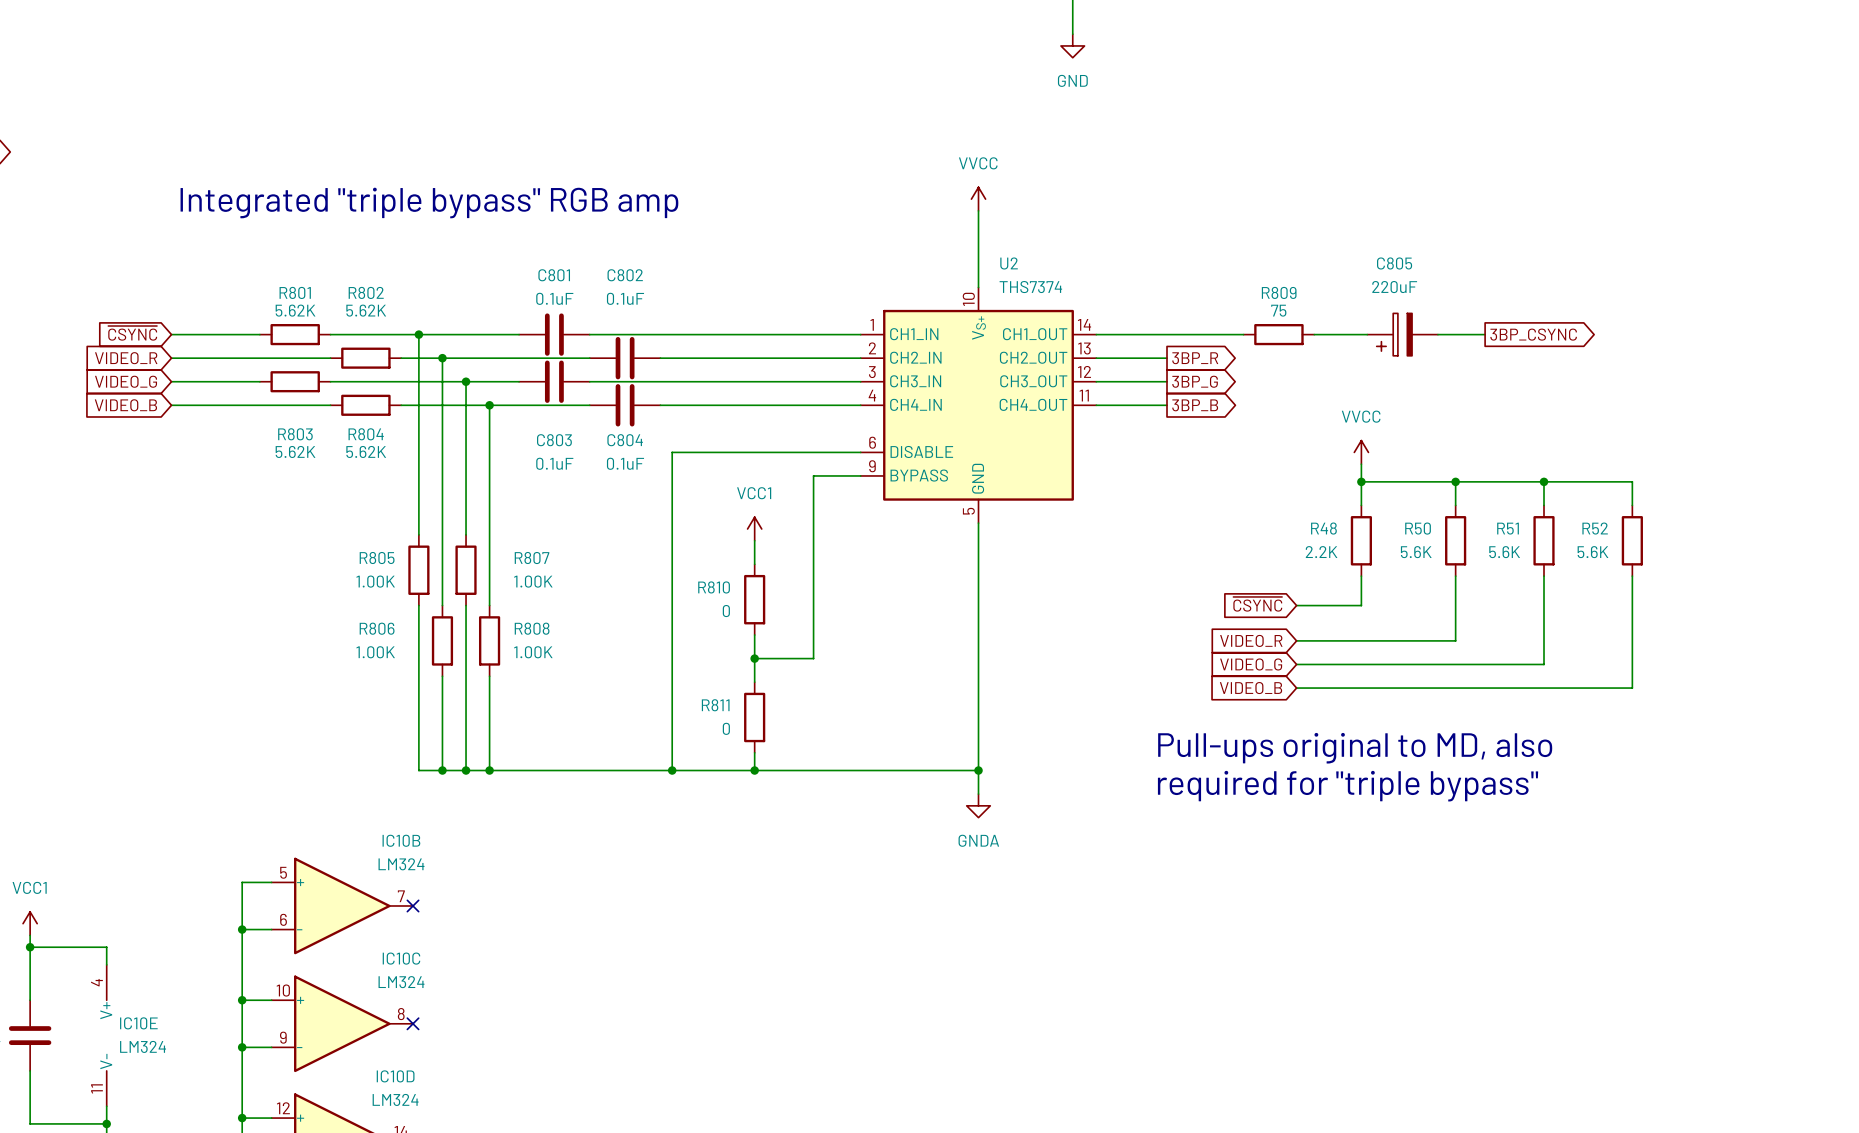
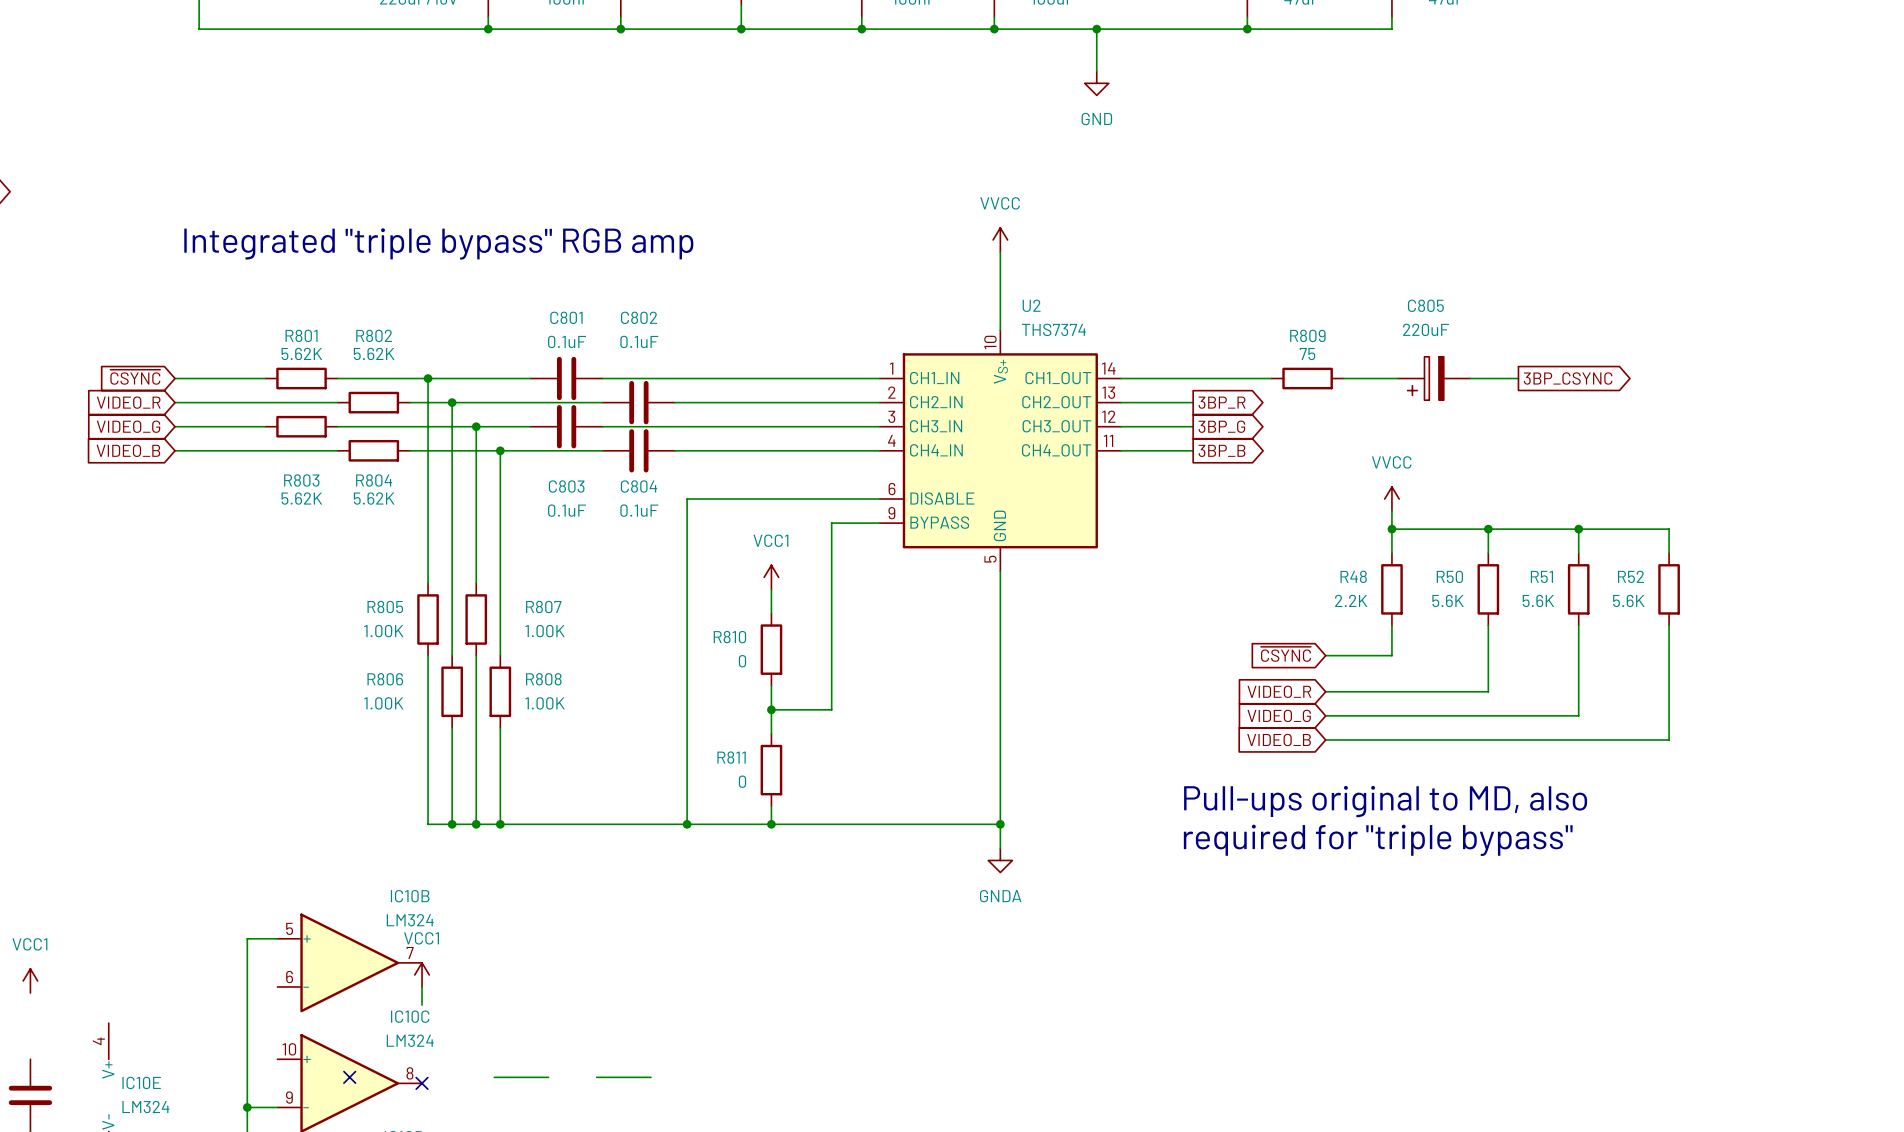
no-connect mark: (413, 905) -> none
power symbol: none -> VCC1 (422, 974)
wire: (242, 929) (271, 929) -> none
junction: (242, 929) -> none
wire: none -> (422, 986) (422, 1005)
wire: (30, 935) (30, 1000) -> none
wire: (30, 947) (106, 947) (106, 964) -> none
junction: (30, 947) -> none
wire: (242, 1000) (271, 1000) -> none
junction: (242, 1000) -> none
no-connect mark: none -> (349, 1077)
wire: none -> (494, 1077) (548, 1077)
wire: none -> (596, 1077) (650, 1077)

